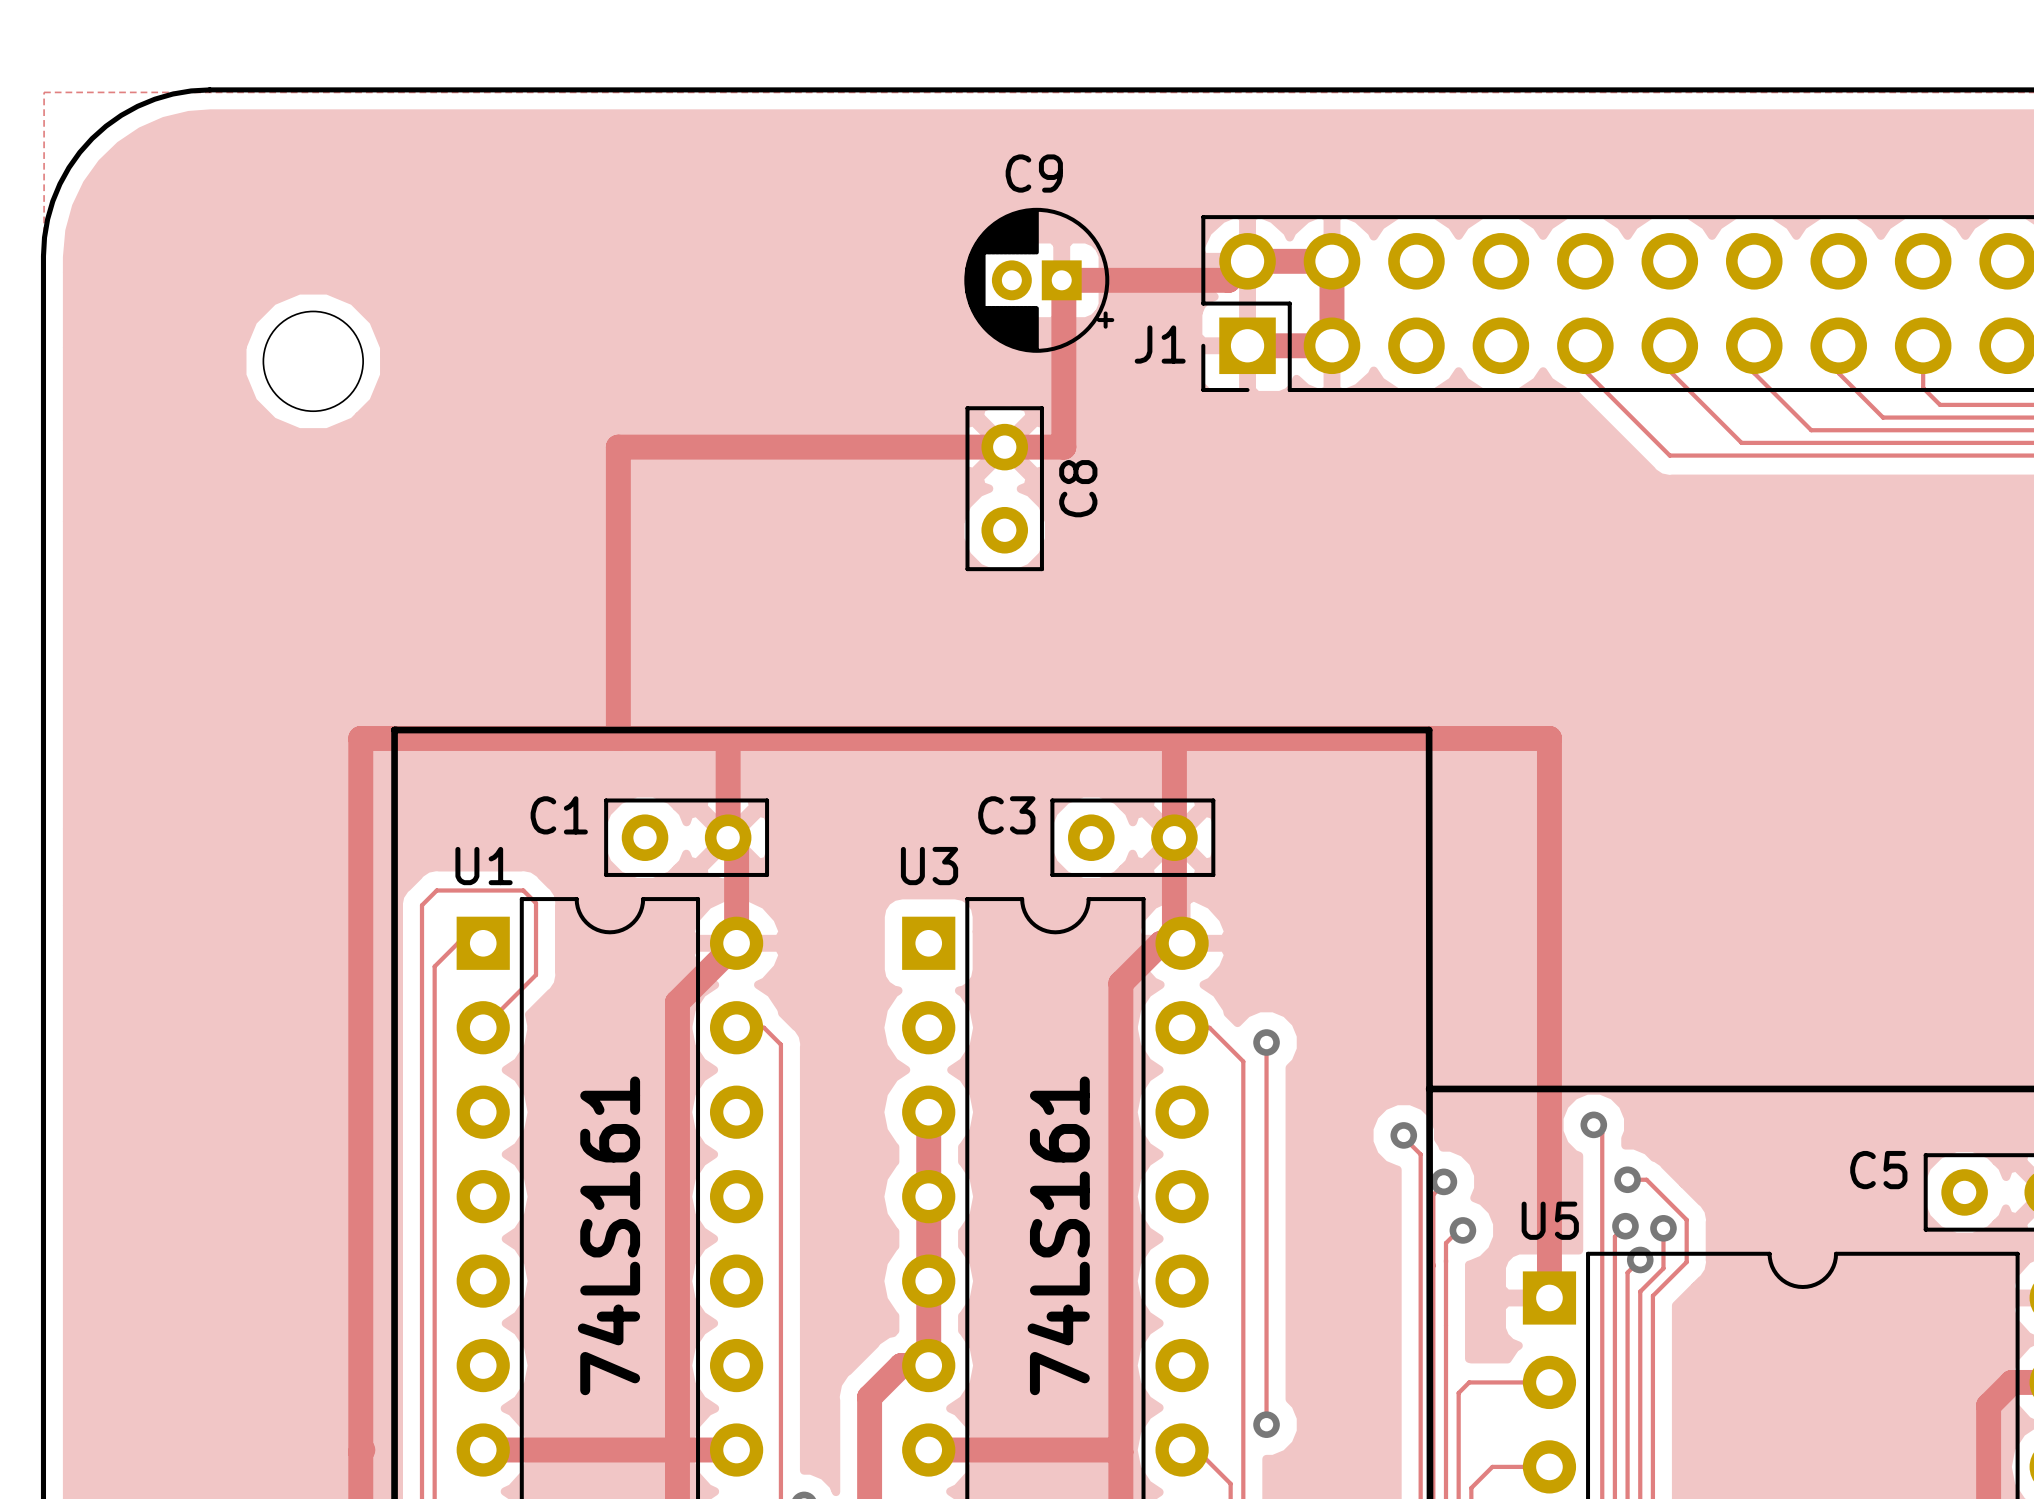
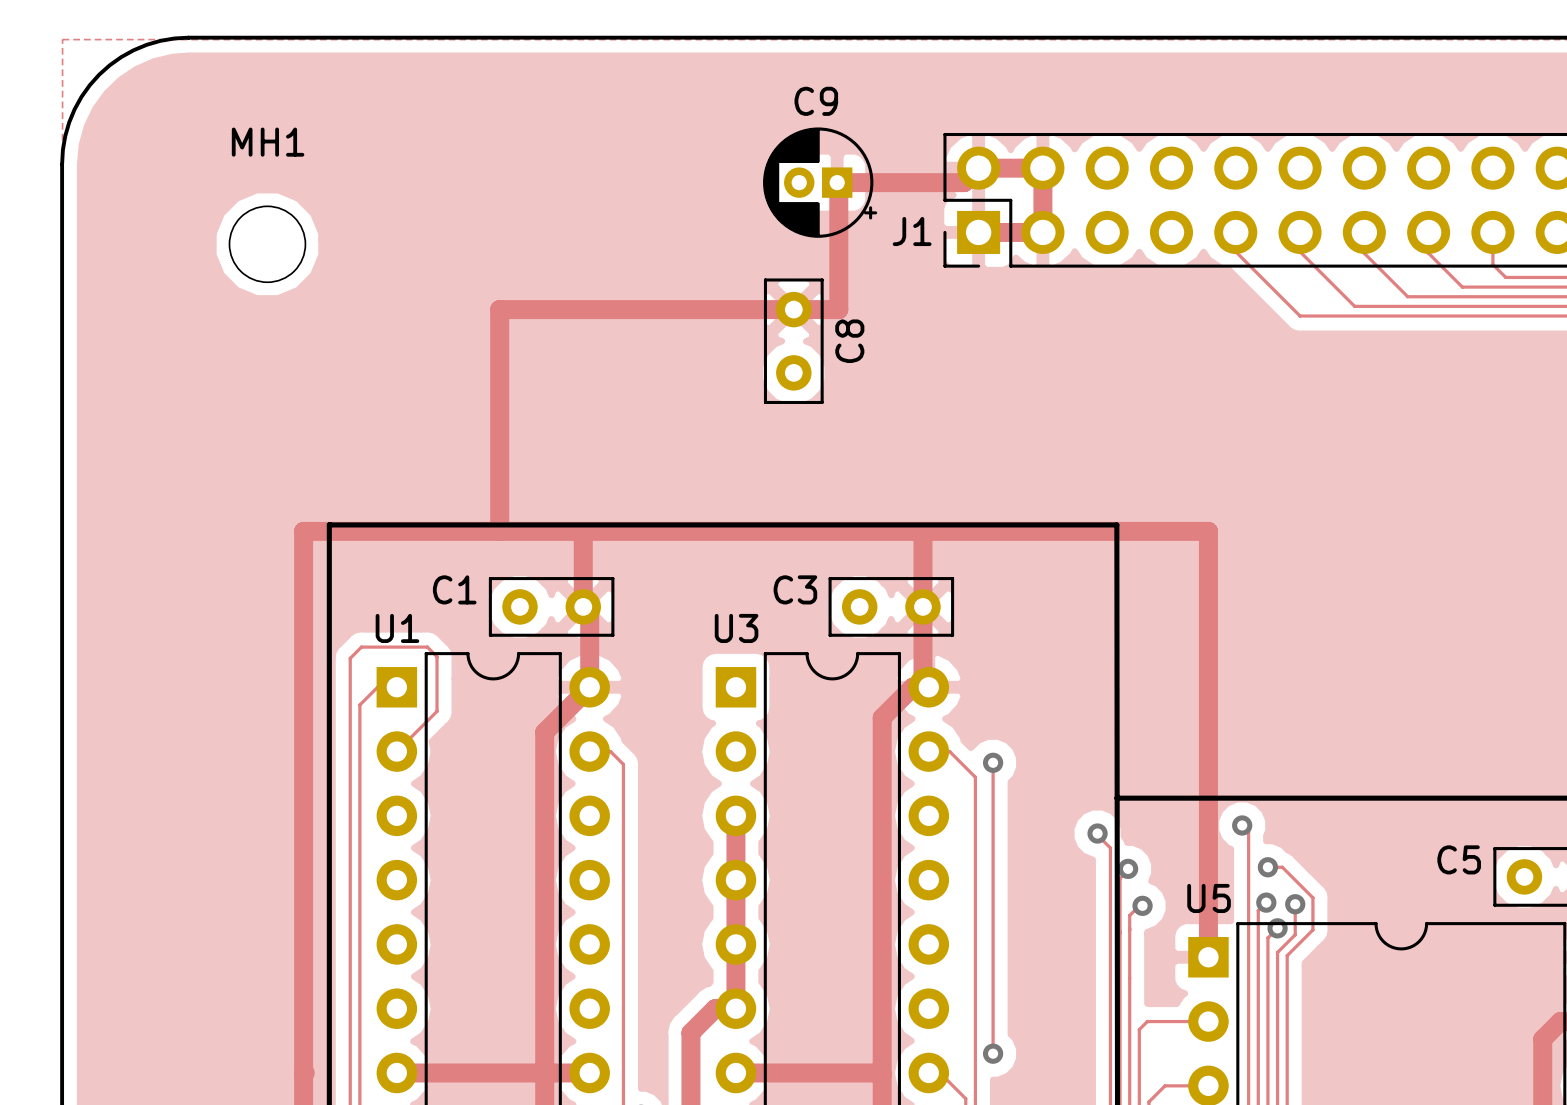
MH1 name: none -> MH1 (268, 142)
text: 74LS161 (608, 1235) -> none
text: 74LS161 (1058, 1235) -> none

